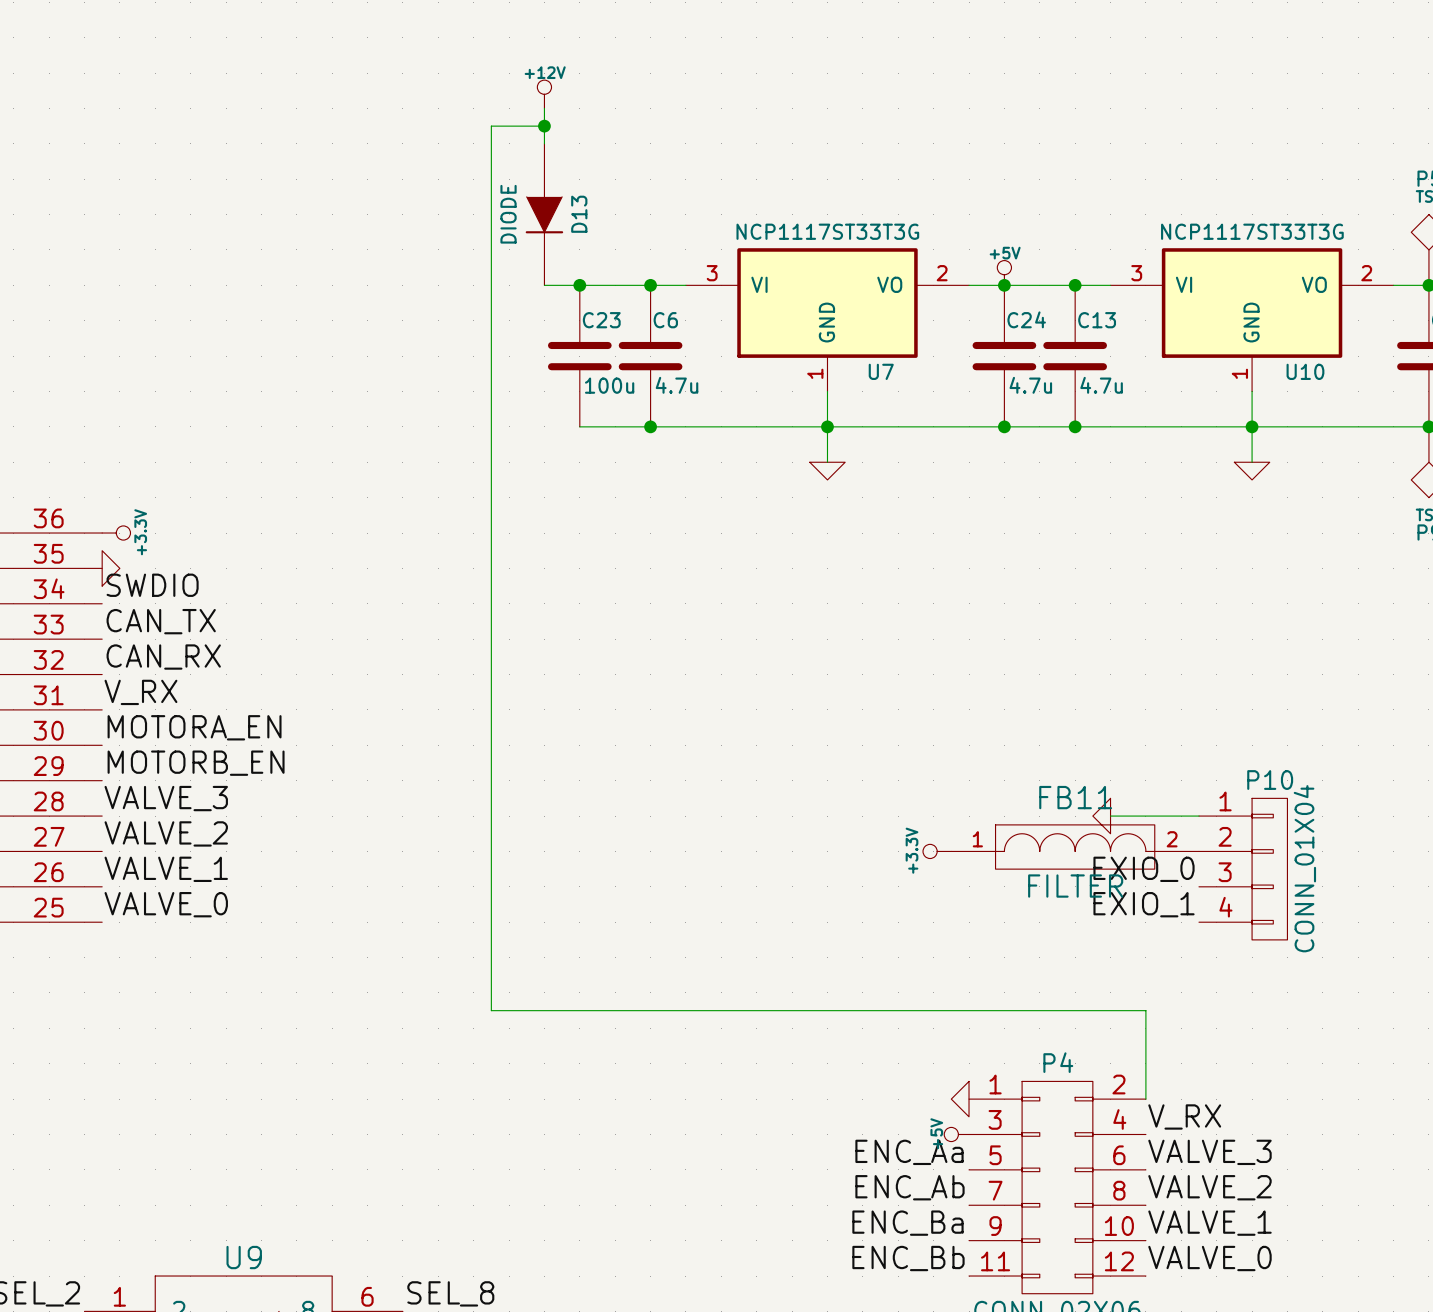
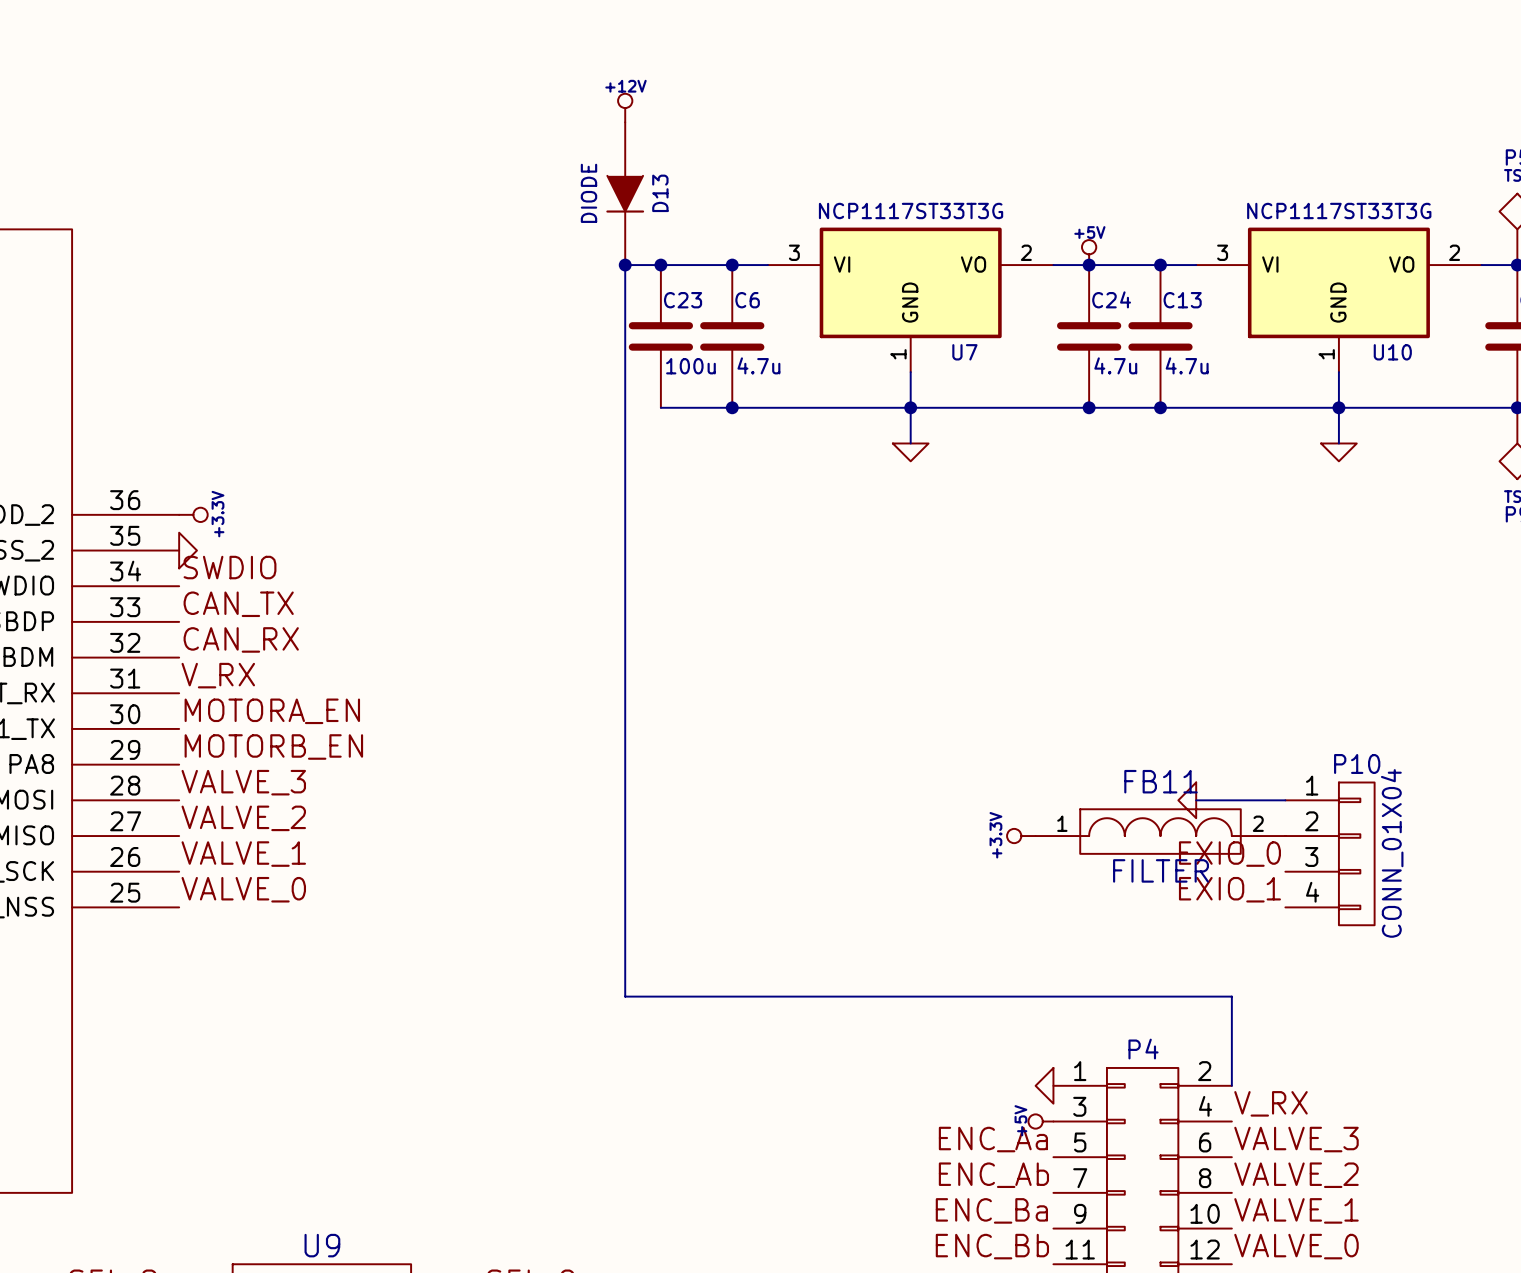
power symbol position: +12V (544, 94) -> +12V (625, 108)
wire: (544, 126) (491, 126) (491, 1010) (544, 1010) -> (625, 265) (625, 996)
junction: (544, 126) -> none
junction: none -> (625, 265)

